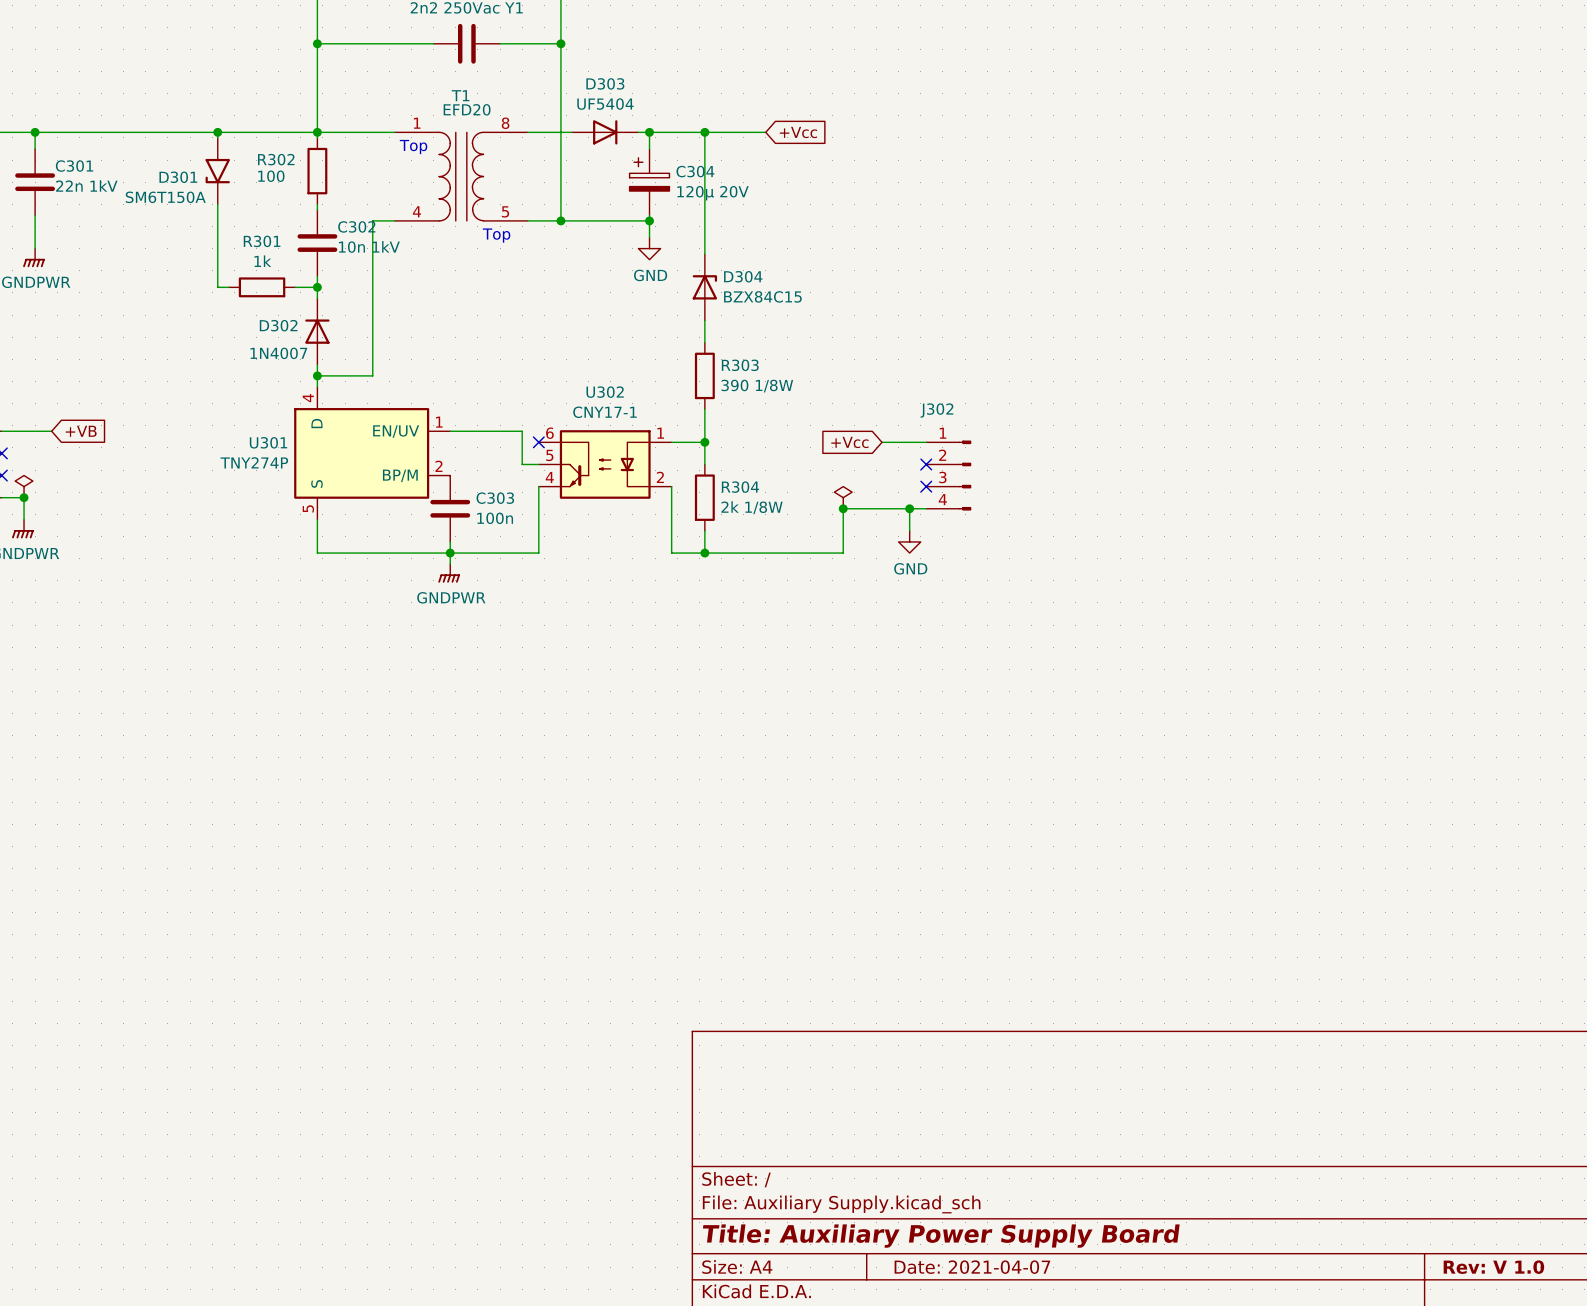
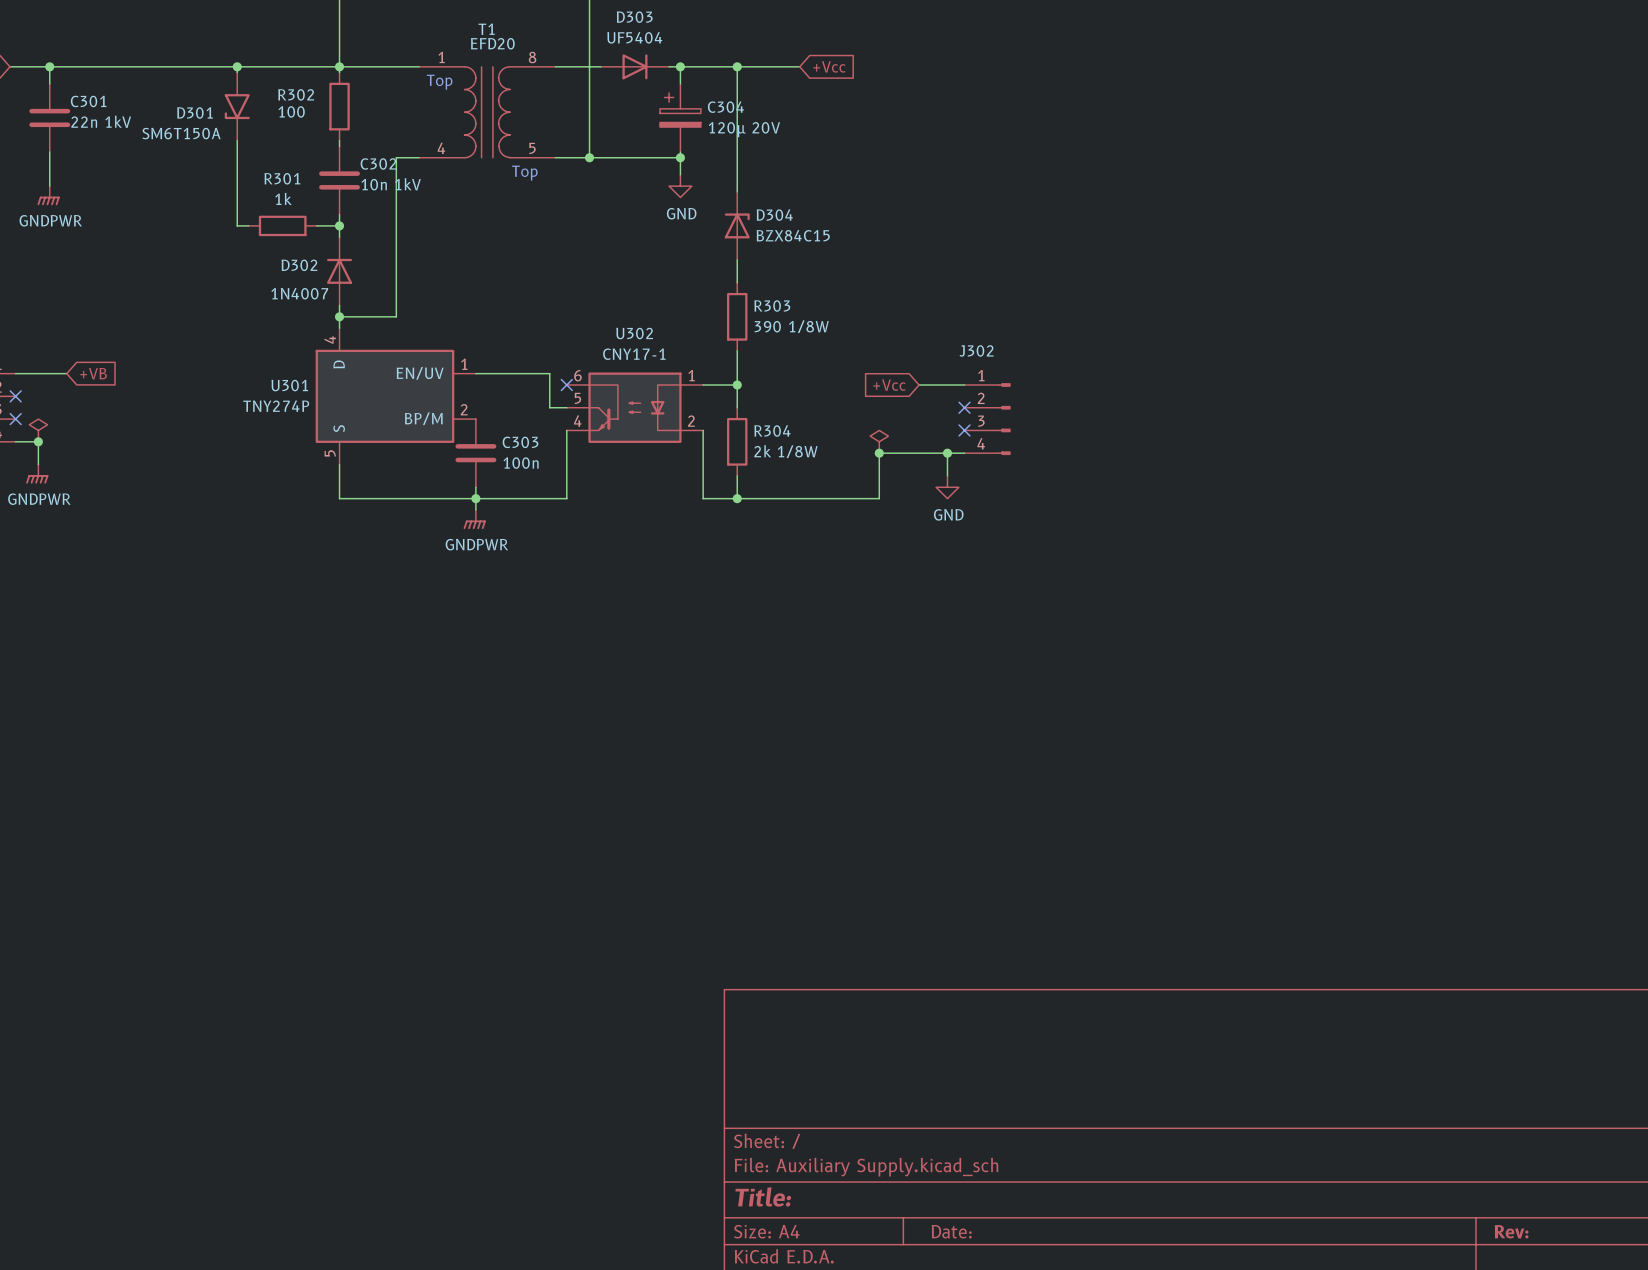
title block: Title: Auxiliary Power Supply Board (941, 1236) -> Title: (763, 1196)
title block: Date: 2021-04-07 (972, 1267) -> Date: (951, 1231)
title block: Rev: V 1.0 (1493, 1267) -> Rev: (1511, 1231)

